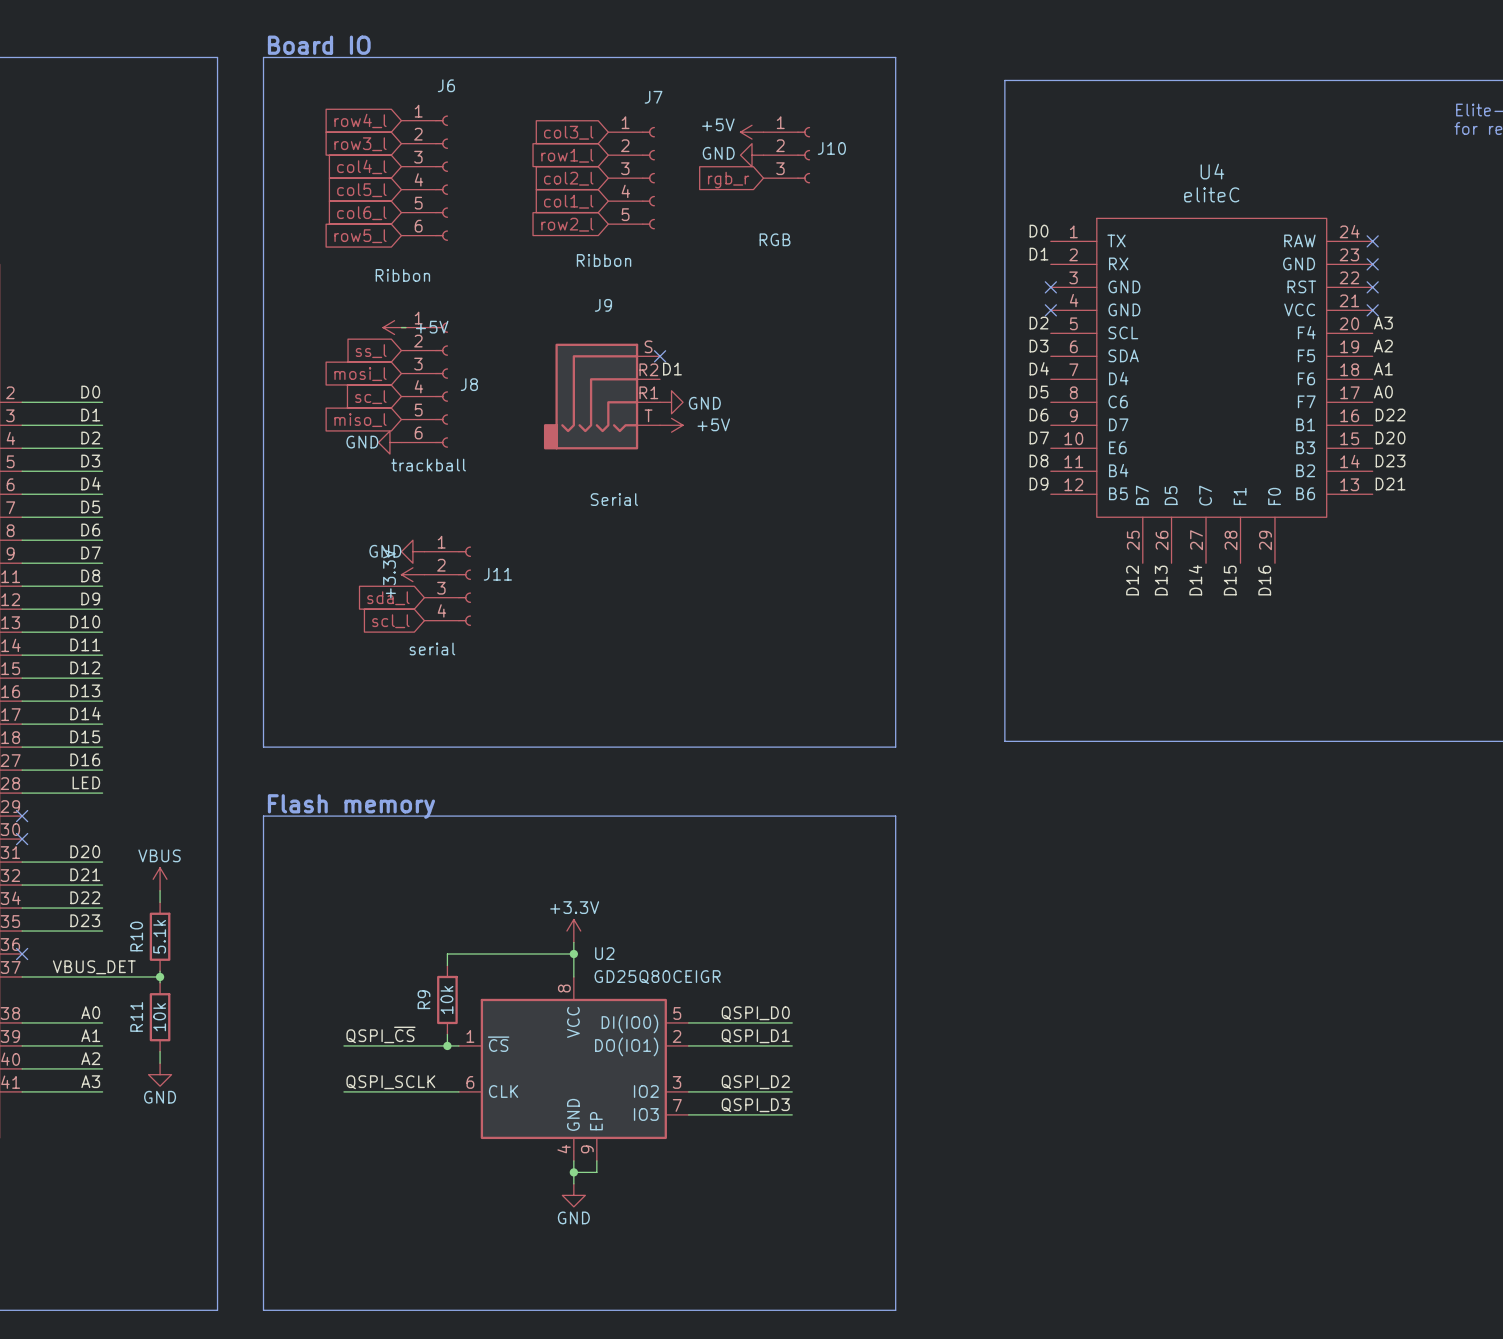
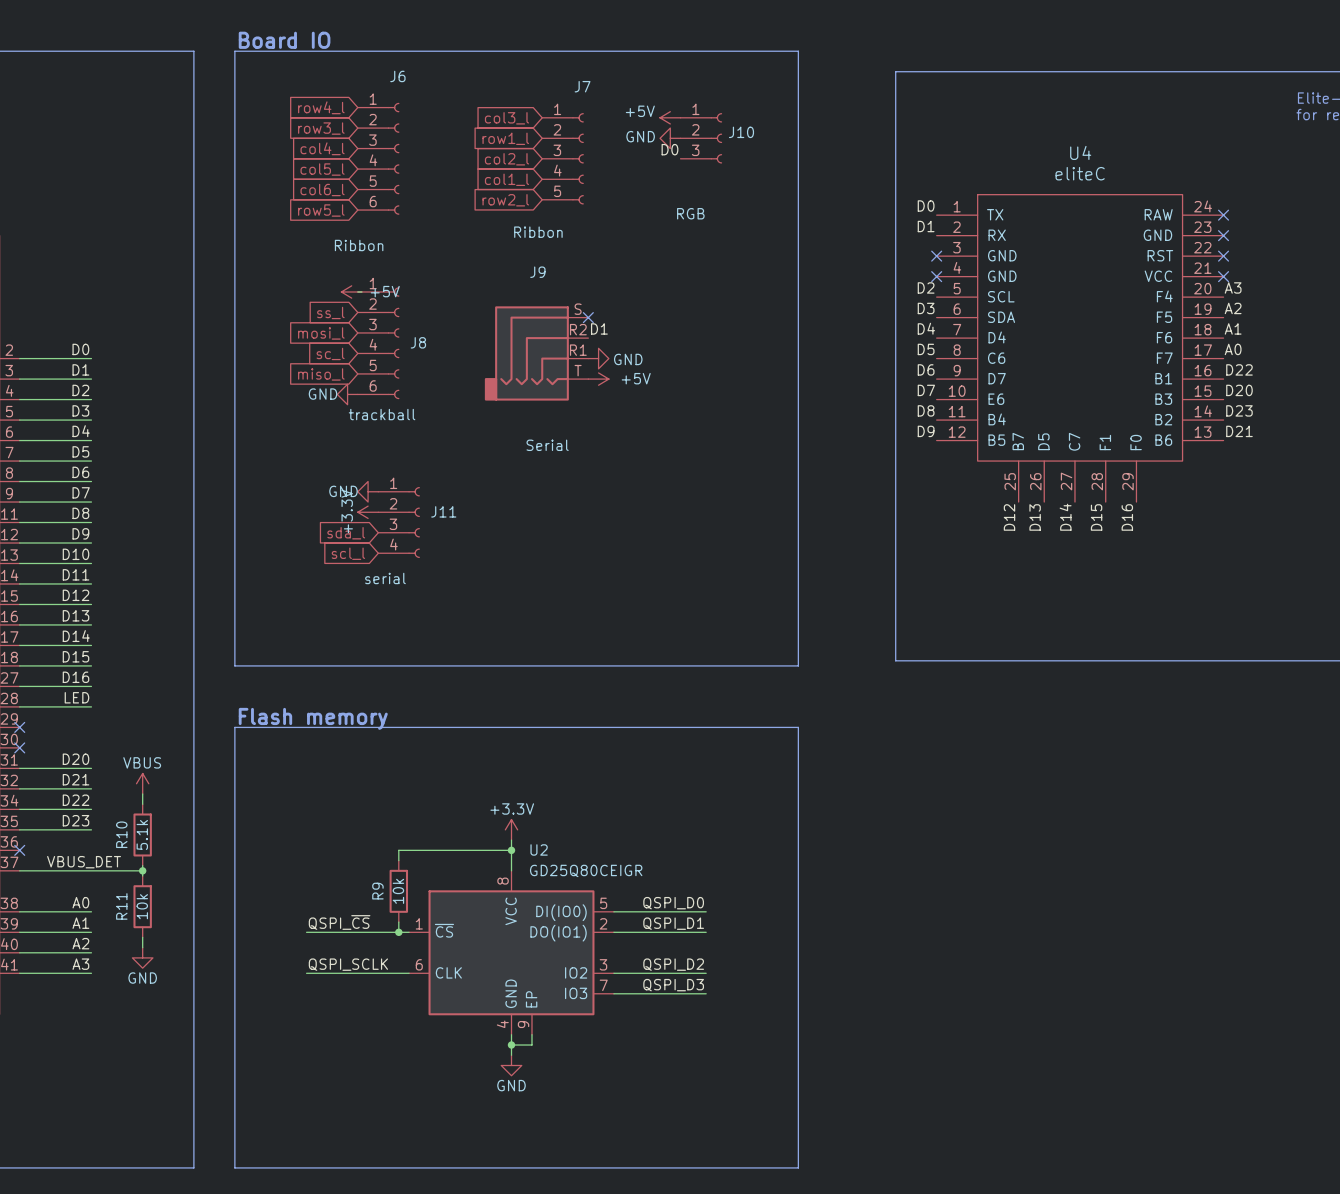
label: none -> D0 (669, 149)
global label: rgb_r (728, 180) -> none

